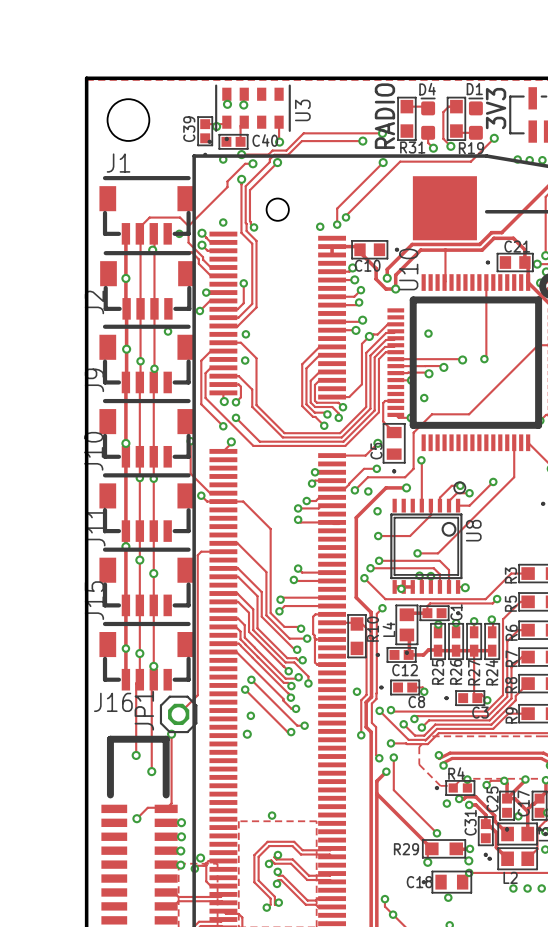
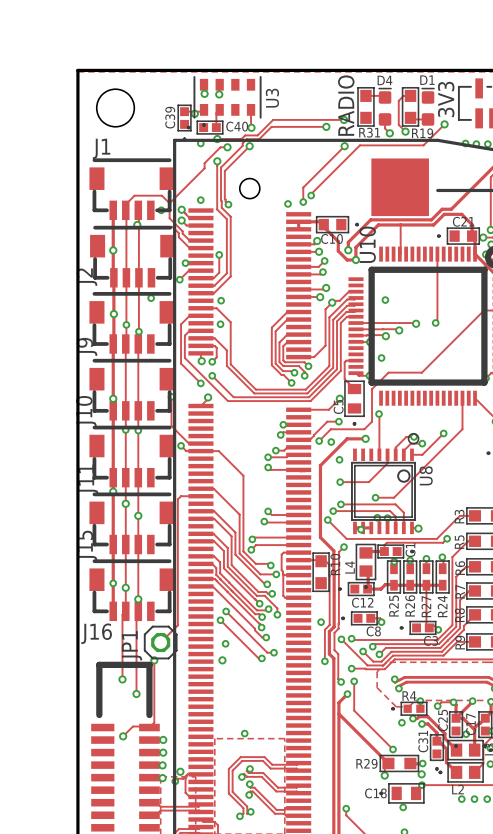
via: (393, 914) -> none

